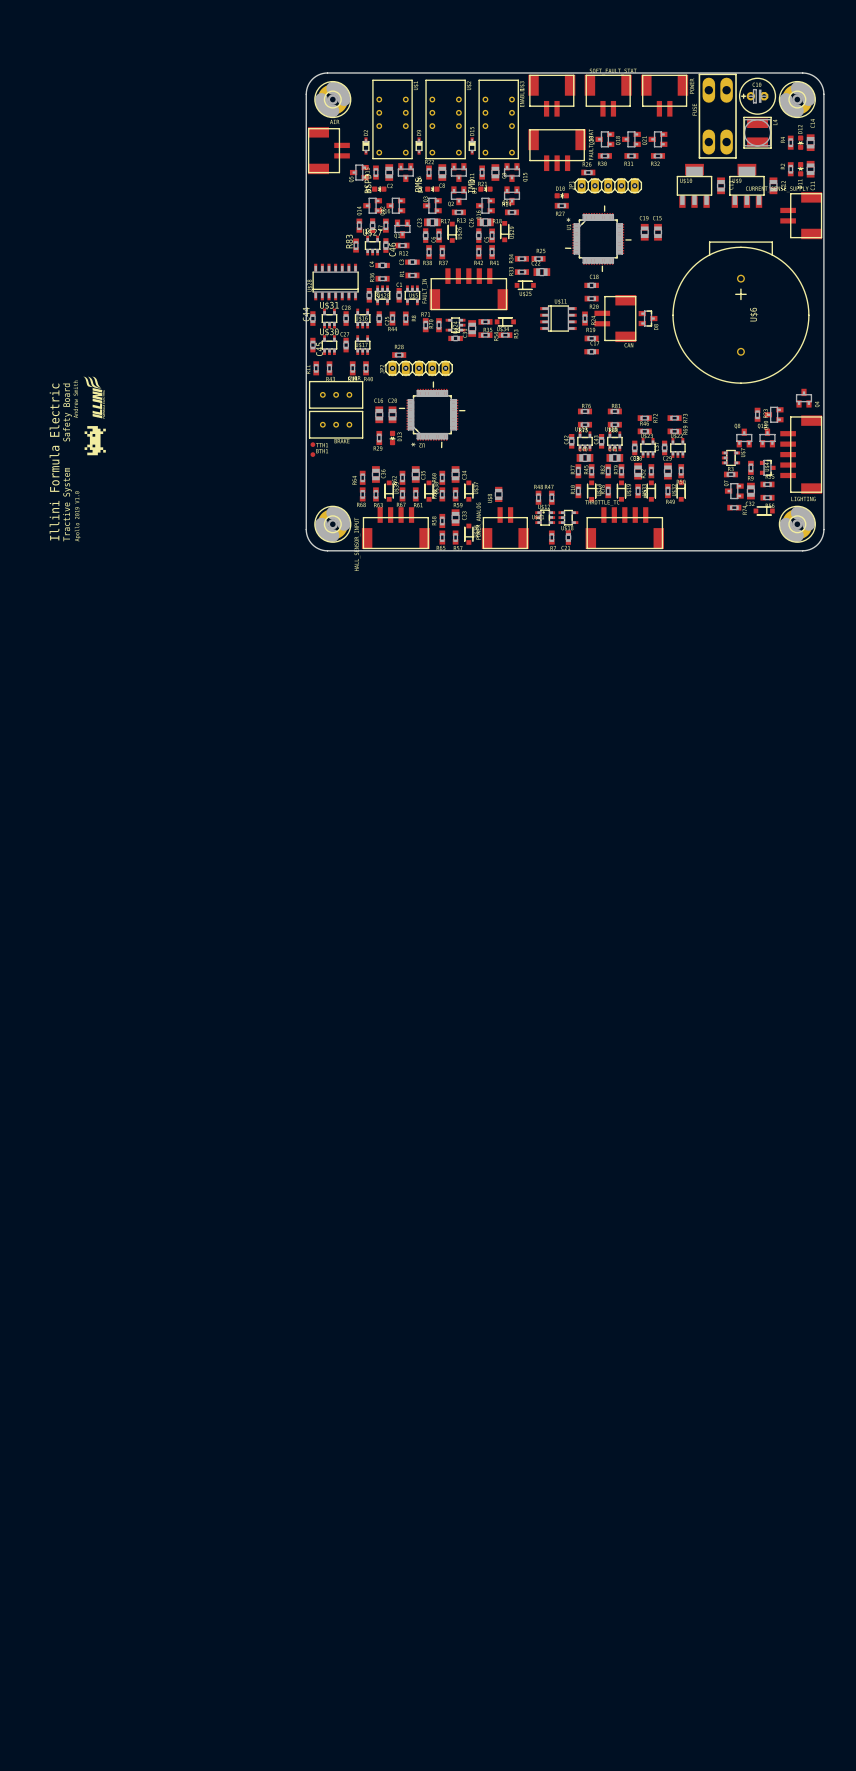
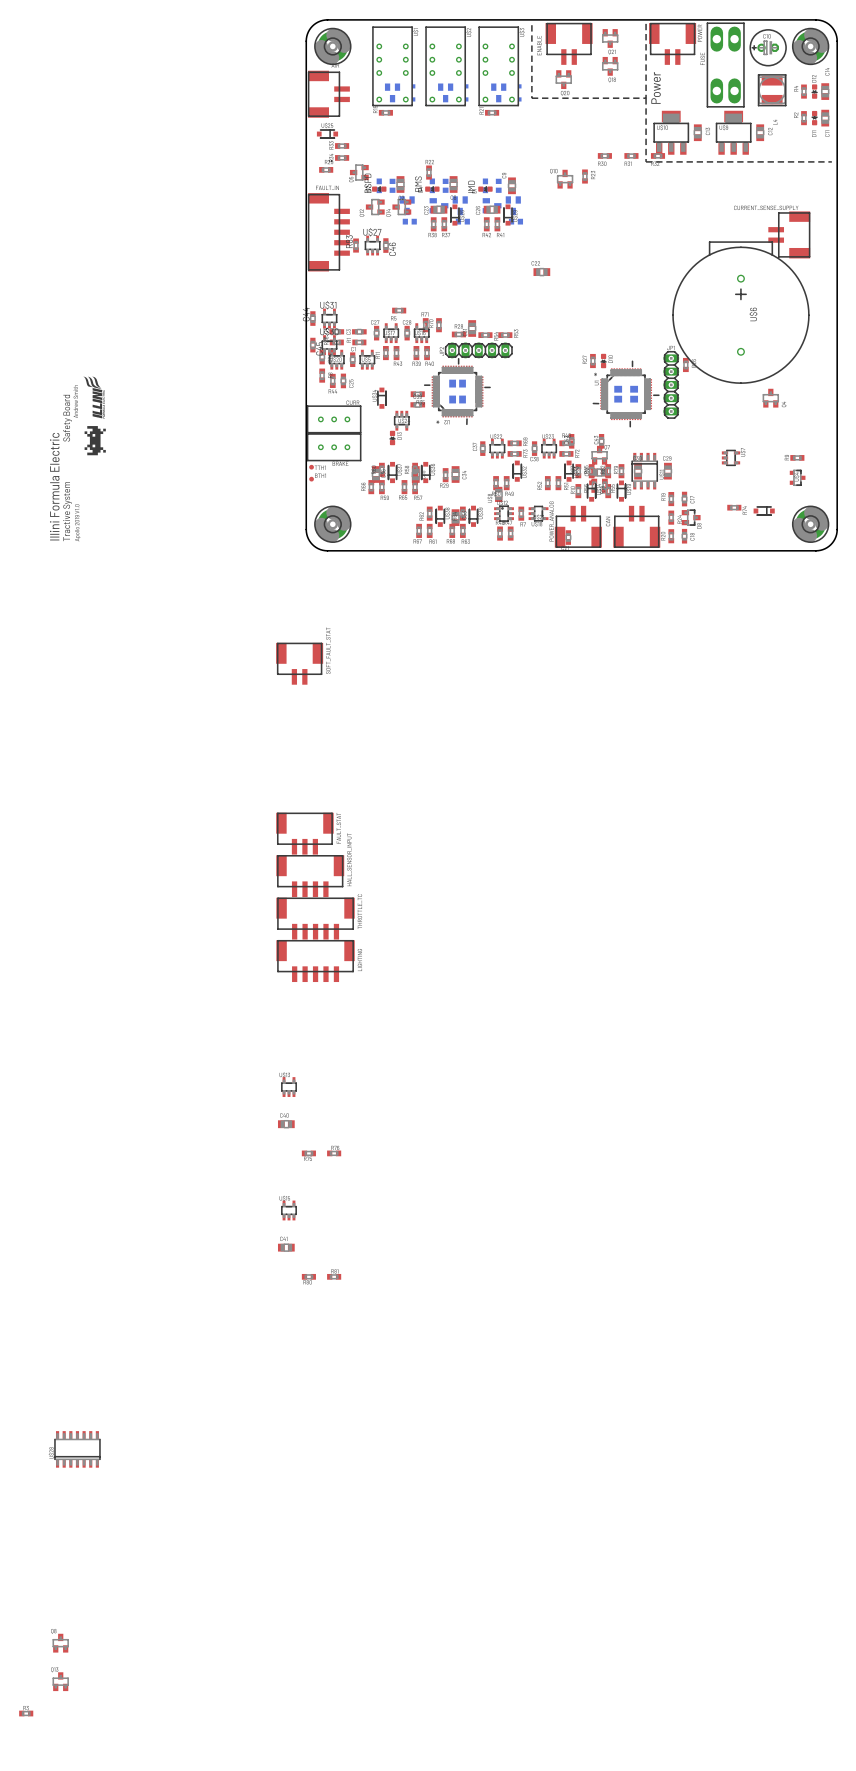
line: none -> (646, 23) (646, 161) (831, 161)
line: none -> (531, 25) (531, 98) (646, 98)
text: none -> Power (656, 87)
board edge: (306, 94) (307, 87) (312, 79) (320, 74) (327, 72) (802, 72) (809, 74) (817, 79) (822, 87) (823, 94) (823, 529) (822, 536) (817, 544) (809, 549) (802, 550) -> (306, 94) (306, 36) (314, 24) (325, 20) (815, 19) (822, 21) (830, 26) (835, 34) (837, 41) (837, 529) (833, 540) (827, 547) (818, 550) (802, 550)
part position: (551, 95) -> (569, 43)
part: (608, 95) -> none
part position: (664, 95) -> (672, 43)
part position: (757, 96) -> (768, 47)
part position: (332, 99) -> (332, 46)
part position: (797, 99) -> (810, 46)
part position: (717, 116) -> (725, 65)
part position: (392, 119) -> (392, 66)
part position: (445, 119) -> (445, 66)
part position: (498, 119) -> (498, 66)
part position: (757, 132) -> (772, 90)
part rotation: 0° (604, 139) -> 90° counterclockwise (563, 79)
part position: (604, 139) -> (563, 79)
part rotation: 0° (631, 139) -> 90° counterclockwise (610, 66)
part position: (631, 139) -> (610, 66)
part rotation: 0° (657, 139) -> 90° counterclockwise (610, 38)
part position: (657, 139) -> (610, 38)
part position: (790, 142) -> (803, 91)
part position: (800, 142) -> (814, 91)
part position: (810, 142) -> (825, 91)
part side: top (365, 145) -> bottom (413, 92)
part side: top (419, 145) -> bottom (466, 92)
part side: top (472, 145) -> bottom (519, 92)
part position: (328, 150) -> (328, 94)
part: (557, 150) -> none
part position: (790, 169) -> (803, 118)
part position: (800, 169) -> (814, 118)
part position: (810, 169) -> (825, 118)
part rotation: 0° (375, 172) -> 90° clockwise (385, 112)
part position: (375, 172) -> (385, 112)
part position: (389, 172) -> (400, 184)
part side: top (405, 172) -> bottom (392, 92)
part position: (442, 172) -> (453, 184)
part side: top (458, 172) -> bottom (445, 92)
part rotation: 0° (482, 172) -> 90° clockwise (492, 112)
part position: (482, 172) -> (492, 112)
part position: (495, 172) -> (511, 185)
part side: top (511, 172) -> bottom (498, 92)
part rotation: 0° (588, 172) -> 90° clockwise (685, 365)
part position: (588, 172) -> (685, 365)
part rotation: 0° (608, 185) -> 90° clockwise (671, 384)
part position: (608, 185) -> (671, 384)
part position: (694, 185) -> (671, 132)
part position: (721, 185) -> (697, 132)
part position: (746, 185) -> (733, 132)
part position: (773, 185) -> (760, 132)
part side: top (458, 195) -> bottom (460, 205)
part side: top (511, 195) -> bottom (513, 205)
part rotation: 0° (561, 195) -> 90° clockwise (603, 361)
part position: (561, 195) -> (603, 361)
part position: (372, 205) -> (401, 207)
part position: (395, 205) -> (375, 207)
part side: top (432, 205) -> bottom (438, 205)
part side: top (485, 205) -> bottom (492, 205)
part rotation: 0° (561, 205) -> 90° clockwise (592, 361)
part position: (561, 205) -> (592, 361)
part side: top (458, 212) -> bottom (462, 221)
part side: top (511, 212) -> bottom (515, 221)
part position: (801, 215) -> (789, 234)
part position: (432, 222) -> (438, 209)
part position: (485, 222) -> (492, 209)
part rotation: 0° (359, 225) -> 90° clockwise (399, 310)
part position: (359, 225) -> (399, 310)
part side: top (372, 225) -> bottom (379, 185)
part side: top (385, 225) -> bottom (392, 185)
part side: top (402, 228) -> bottom (407, 205)
part position: (504, 231) -> (508, 215)
part: none -> (328, 232)
part position: (452, 232) -> (454, 215)
part: (644, 232) -> none
part: (657, 232) -> none
part side: top (425, 235) -> bottom (432, 185)
part side: top (438, 235) -> bottom (445, 185)
part side: top (478, 235) -> bottom (485, 185)
part side: top (492, 235) -> bottom (498, 185)
part position: (598, 238) -> (626, 394)
part side: top (402, 245) -> bottom (409, 221)
part position: (429, 252) -> (433, 224)
part position: (442, 252) -> (444, 224)
part position: (478, 252) -> (486, 224)
part position: (492, 252) -> (497, 224)
part position: (521, 258) -> (342, 157)
part position: (538, 258) -> (326, 169)
part position: (412, 262) -> (359, 331)
part position: (382, 265) -> (336, 331)
part position: (521, 272) -> (342, 145)
part position: (412, 275) -> (359, 342)
part position: (382, 278) -> (336, 342)
part position: (335, 282) -> (77, 1449)
part rotation: 0° (525, 285) -> 180° (327, 134)
part position: (525, 285) -> (327, 134)
part rotation: 0° (591, 285) -> 90° clockwise (684, 536)
part position: (591, 285) -> (684, 536)
part: (468, 289) -> none
part position: (369, 295) -> (322, 357)
part rotation: 0° (382, 295) -> 180° (336, 359)
part position: (382, 295) -> (336, 359)
part position: (399, 295) -> (352, 359)
part rotation: 0° (412, 295) -> 180° (367, 359)
part position: (412, 295) -> (367, 359)
part rotation: 0° (591, 298) -> 90° clockwise (671, 536)
part position: (591, 298) -> (671, 536)
part position: (346, 318) -> (407, 333)
part position: (362, 318) -> (421, 333)
part position: (379, 318) -> (343, 380)
part position: (392, 318) -> (332, 380)
part position: (405, 318) -> (322, 375)
part rotation: 0° (558, 318) -> 90° clockwise (644, 471)
part position: (558, 318) -> (644, 471)
part position: (584, 318) -> (671, 517)
part: (615, 318) -> none
part position: (648, 318) -> (691, 517)
part position: (485, 321) -> (417, 394)
part rotation: 0° (505, 321) -> 90° clockwise (381, 398)
part position: (505, 321) -> (381, 398)
part rotation: 0° (455, 325) -> 90° counterclockwise (401, 420)
part position: (455, 325) -> (401, 420)
part position: (455, 338) -> (417, 404)
part rotation: 0° (591, 338) -> 90° clockwise (671, 499)
part position: (591, 338) -> (671, 499)
part position: (346, 345) -> (376, 333)
part position: (362, 345) -> (391, 333)
part rotation: 0° (591, 351) -> 90° clockwise (684, 499)
part position: (591, 351) -> (684, 499)
part position: (399, 355) -> (458, 334)
part position: (316, 368) -> (385, 353)
part position: (329, 368) -> (396, 353)
part position: (352, 368) -> (416, 353)
part position: (365, 368) -> (427, 353)
part position: (419, 368) -> (478, 350)
part position: (336, 394) -> (334, 419)
part: none -> (618, 394)
part: none -> (634, 394)
part position: (803, 398) -> (770, 398)
part position: (584, 411) -> (334, 1153)
part position: (614, 411) -> (334, 1276)
part side: top (379, 414) -> bottom (457, 399)
part side: top (392, 414) -> bottom (457, 383)
part position: (432, 414) -> (457, 391)
part position: (757, 414) -> (584, 176)
part rotation: 0° (774, 414) -> 90° clockwise (565, 179)
part position: (774, 414) -> (565, 179)
part position: (644, 418) -> (566, 453)
part position: (674, 418) -> (514, 453)
part position: (336, 424) -> (334, 447)
part position: (584, 424) -> (308, 1153)
part position: (614, 424) -> (308, 1276)
part position: (644, 431) -> (566, 443)
part position: (674, 431) -> (514, 443)
part position: (379, 438) -> (445, 475)
part position: (744, 438) -> (60, 1643)
part position: (767, 438) -> (60, 1681)
part position: (584, 441) -> (289, 1087)
part position: (614, 441) -> (289, 1210)
part position: (312, 444) -> (311, 467)
part position: (634, 447) -> (534, 448)
part position: (648, 447) -> (549, 448)
part position: (664, 447) -> (482, 448)
part position: (677, 447) -> (497, 448)
part position: (312, 454) -> (311, 479)
part: (801, 454) -> none
part position: (584, 457) -> (286, 1124)
part position: (614, 457) -> (286, 1247)
part rotation: 0° (750, 467) -> 90° clockwise (797, 457)
part position: (750, 467) -> (797, 457)
part position: (767, 467) -> (797, 477)
part position: (651, 471) -> (547, 483)
part position: (681, 471) -> (496, 483)
part position: (730, 474) -> (26, 1713)
part position: (362, 477) -> (462, 513)
part position: (402, 477) -> (429, 513)
part position: (442, 477) -> (381, 469)
part rotation: 0° (767, 484) -> 90° clockwise (604, 485)
part position: (767, 484) -> (604, 485)
part position: (389, 491) -> (473, 516)
part position: (429, 491) -> (440, 516)
part position: (468, 491) -> (392, 472)
part position: (638, 491) -> (558, 483)
part rotation: 0° (651, 491) -> 180° (569, 471)
part position: (651, 491) -> (569, 471)
part position: (667, 491) -> (506, 483)
part rotation: 0° (681, 491) -> 180° (517, 471)
part position: (681, 491) -> (517, 471)
part rotation: 0° (734, 491) -> 90° clockwise (599, 455)
part position: (734, 491) -> (599, 455)
part rotation: 0° (750, 491) -> 90° clockwise (599, 472)
part position: (750, 491) -> (599, 472)
part position: (362, 494) -> (452, 530)
part position: (375, 494) -> (462, 530)
part position: (402, 494) -> (419, 530)
part position: (415, 494) -> (429, 530)
part position: (442, 494) -> (371, 487)
part position: (455, 494) -> (381, 487)
part position: (538, 497) -> (500, 533)
part position: (551, 497) -> (510, 533)
part rotation: 0° (767, 497) -> 90° clockwise (594, 485)
part position: (767, 497) -> (594, 485)
part position: (545, 517) -> (504, 513)
part position: (568, 517) -> (538, 513)
part position: (442, 520) -> (415, 469)
part position: (797, 524) -> (810, 524)
part: none -> (636, 526)
part: (395, 528) -> none
part position: (505, 528) -> (578, 526)
part: (624, 528) -> none
part position: (468, 534) -> (425, 472)
part position: (442, 537) -> (404, 487)
part position: (455, 537) -> (415, 487)
part position: (551, 537) -> (521, 513)
part: none -> (299, 663)
part: none -> (304, 833)
part: none -> (310, 876)
part: none -> (315, 918)
part: none -> (315, 961)

